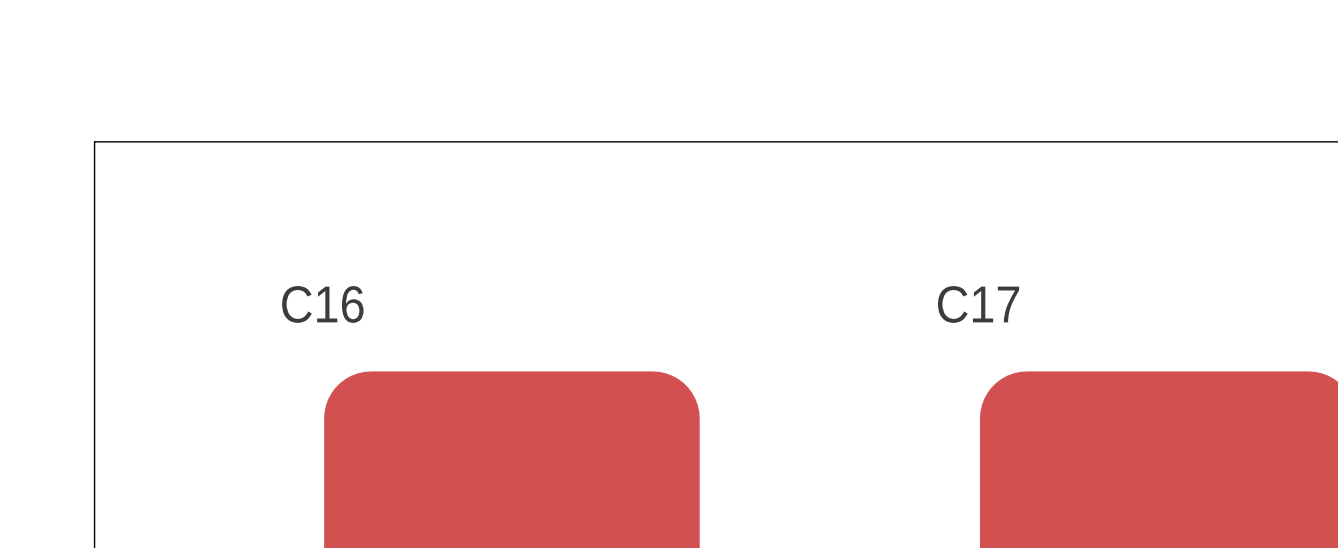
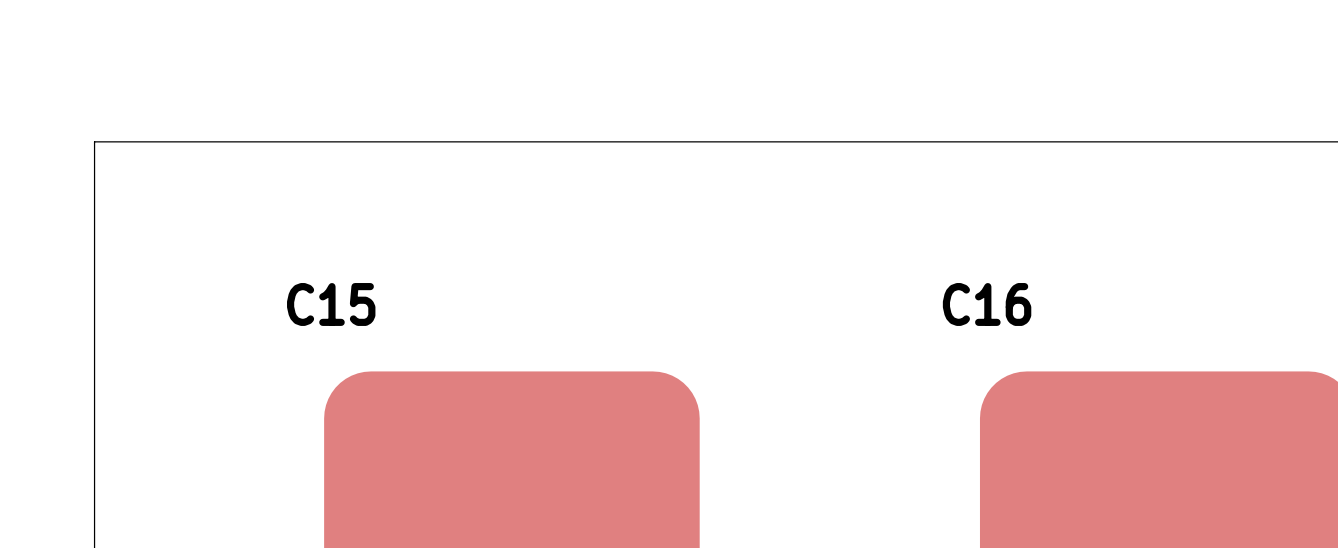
C16 name: C16 (322, 304) -> C15 (331, 304)
C17 name: C17 (978, 304) -> C16 (987, 304)

